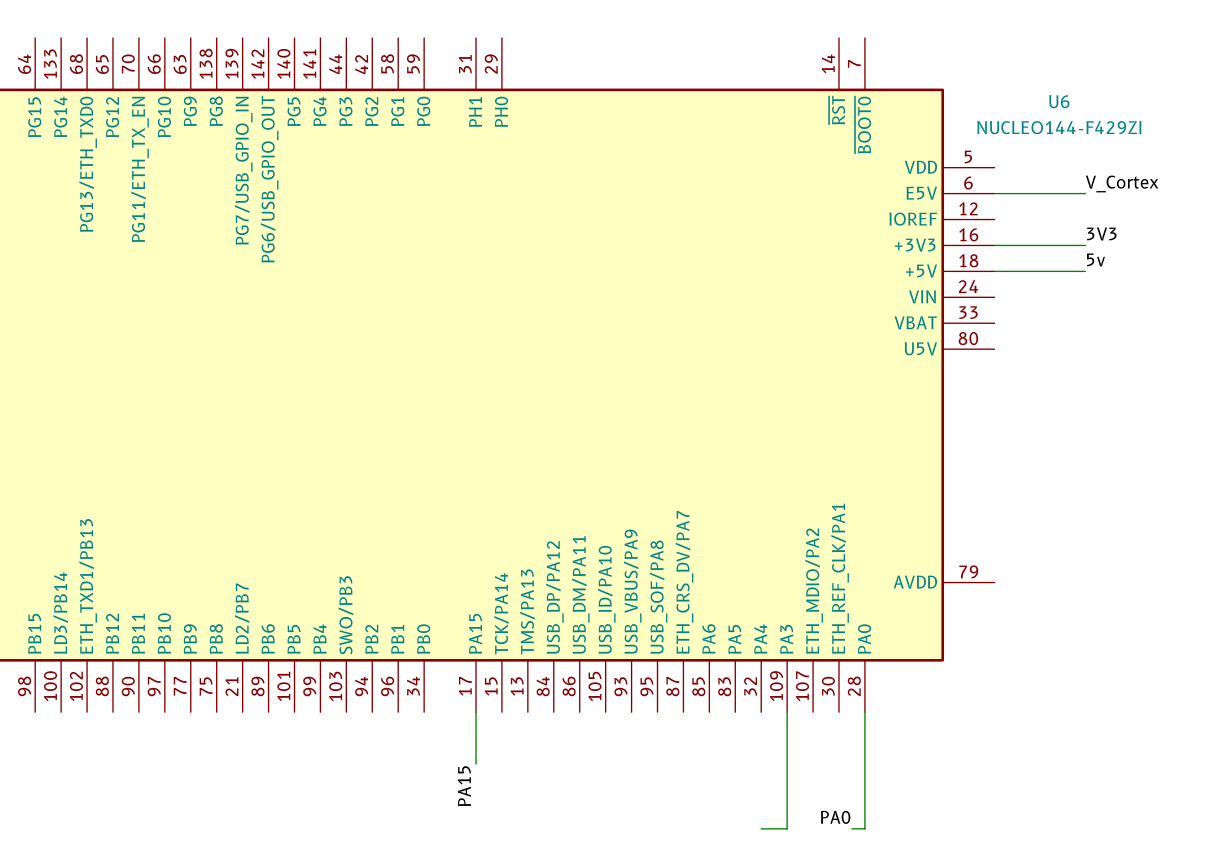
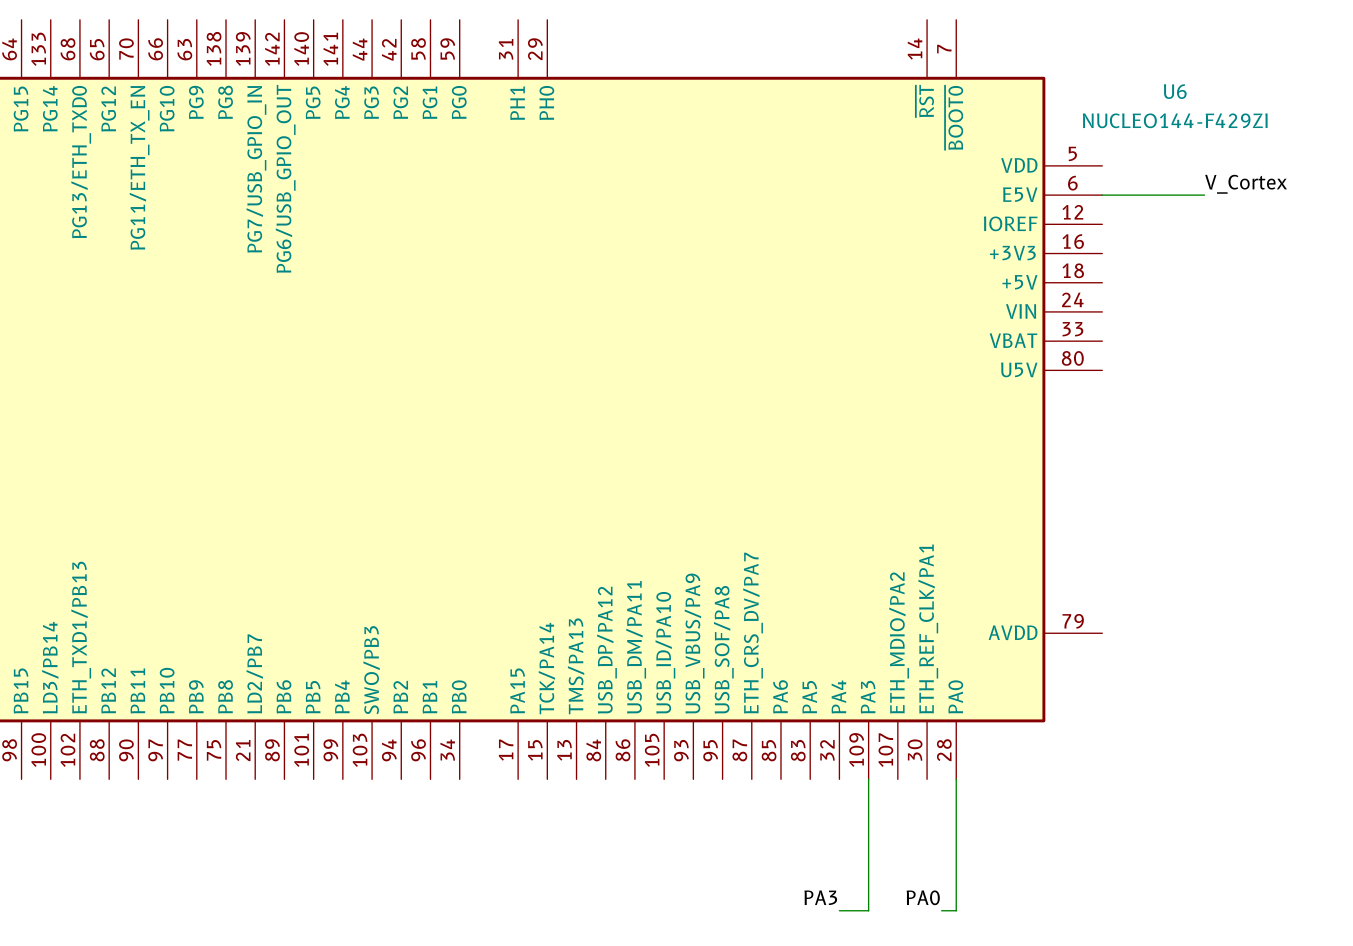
label: 3V3 (1101, 233) -> none
wire: (994, 245) (1085, 245) -> none
label: 5v (1096, 259) -> none
wire: (994, 271) (1085, 271) -> none
wire: (475, 712) (475, 764) -> none
label: PA15 (464, 786) -> none
label: none -> PA3 (820, 897)

